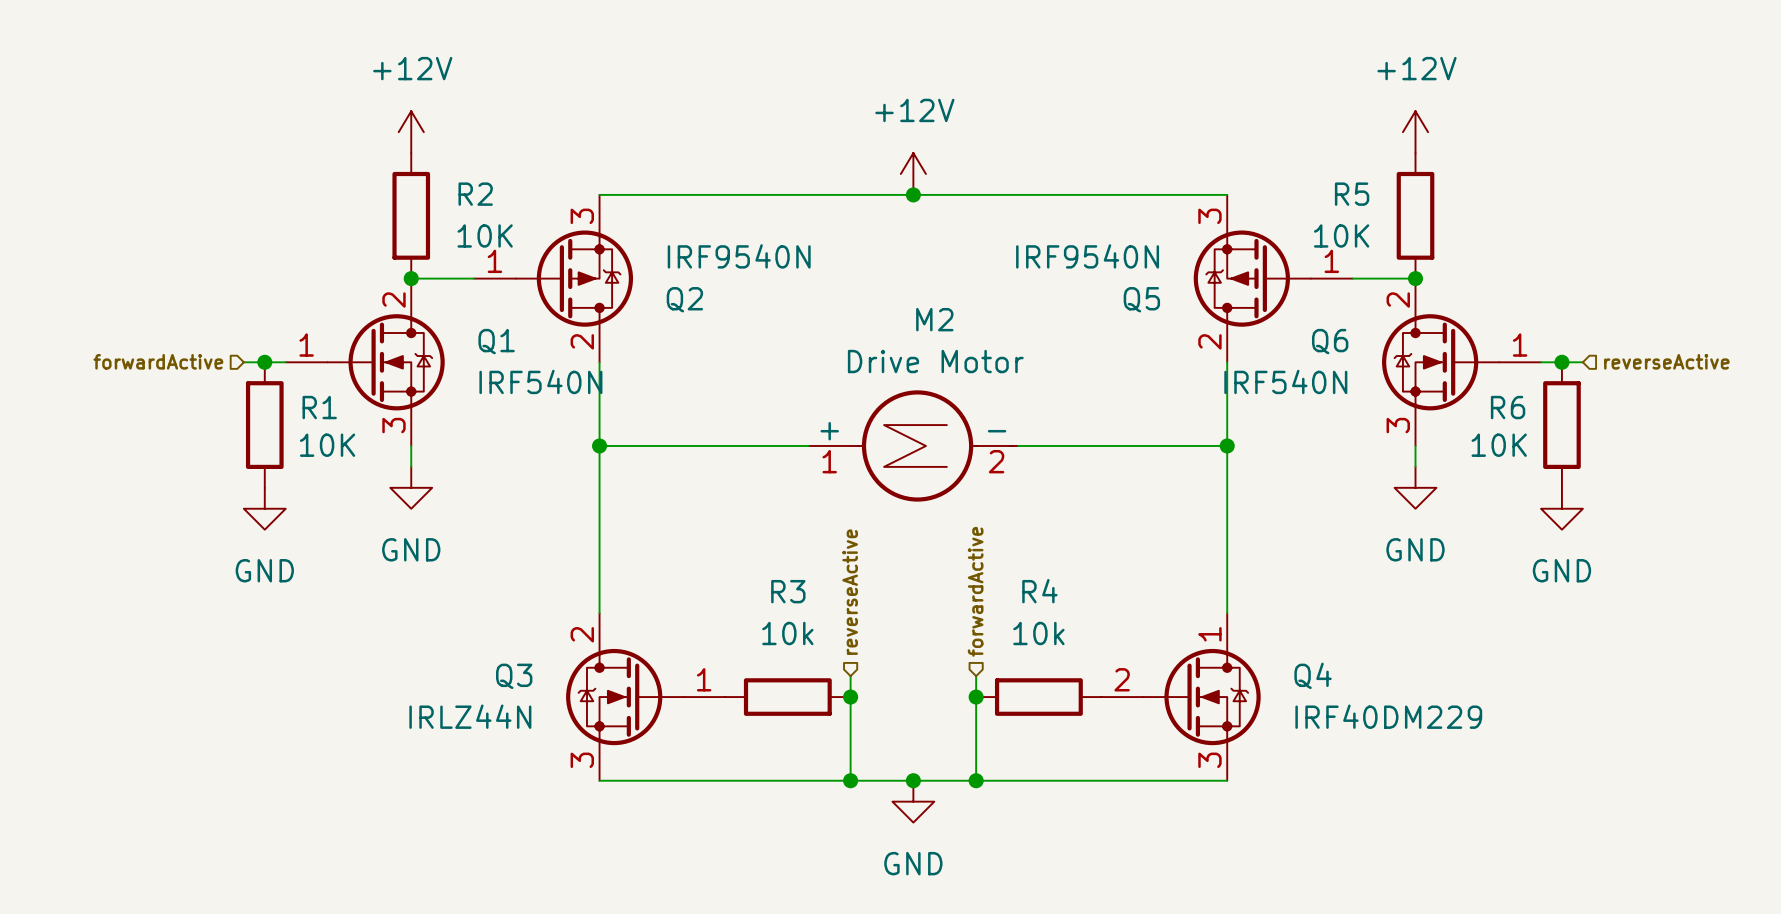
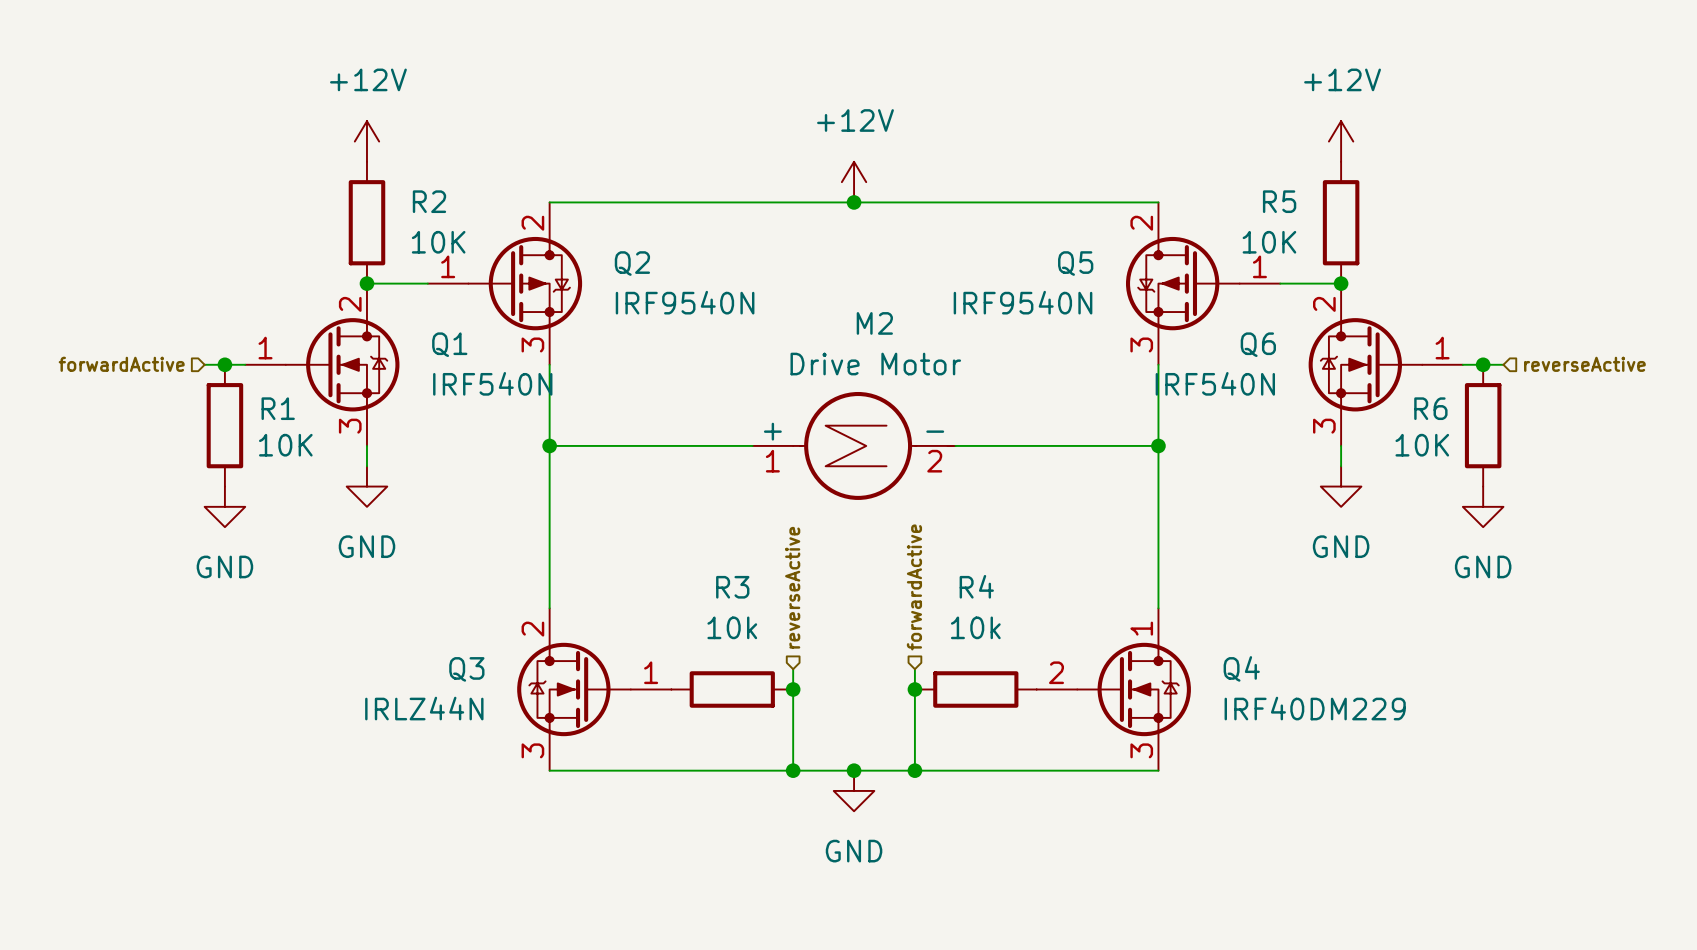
Q2 flip: as is (574, 278) -> up-down (525, 283)
Q5 flip: as is (1252, 278) -> up-down (1182, 283)

